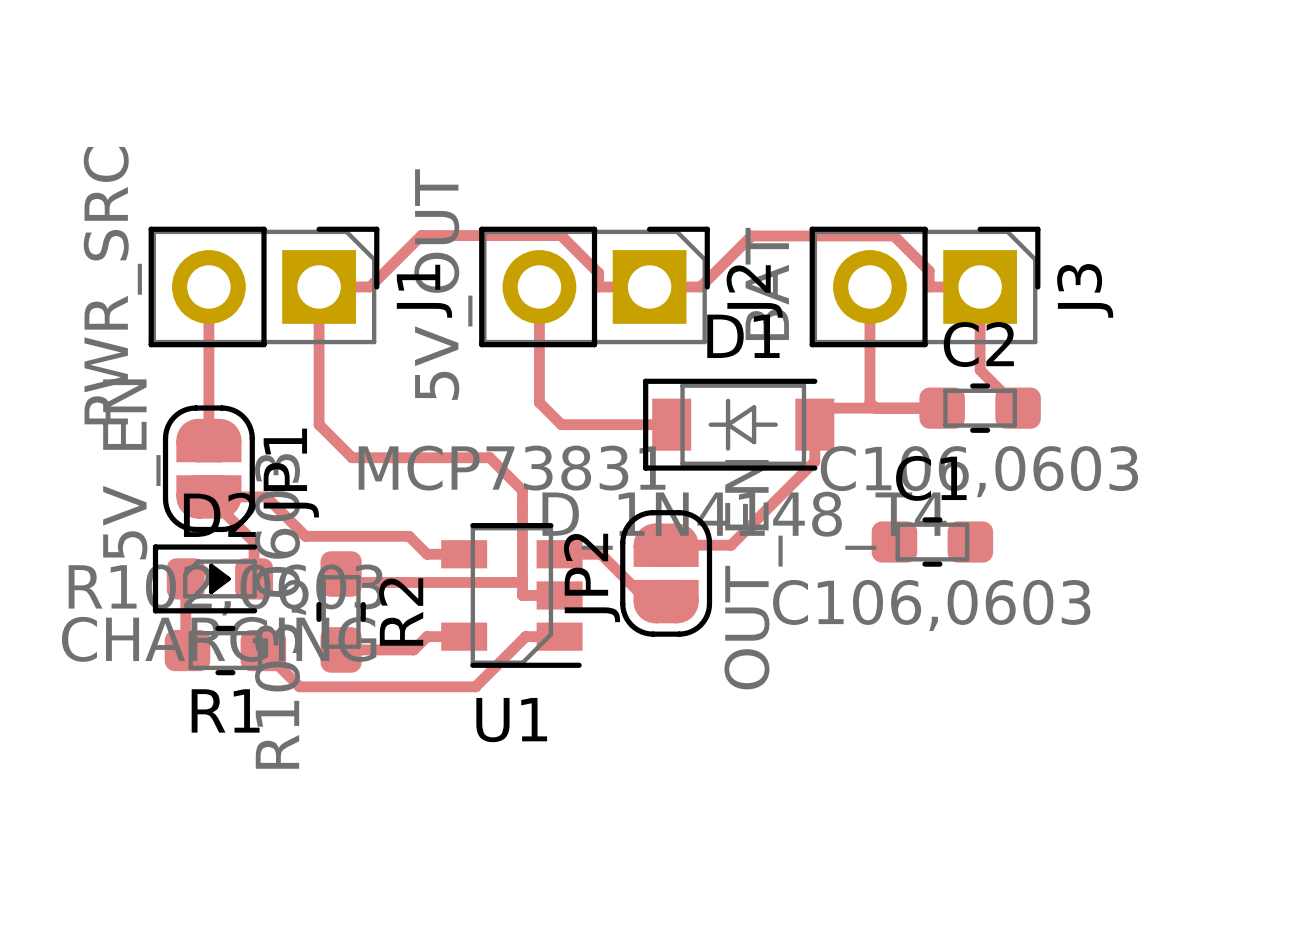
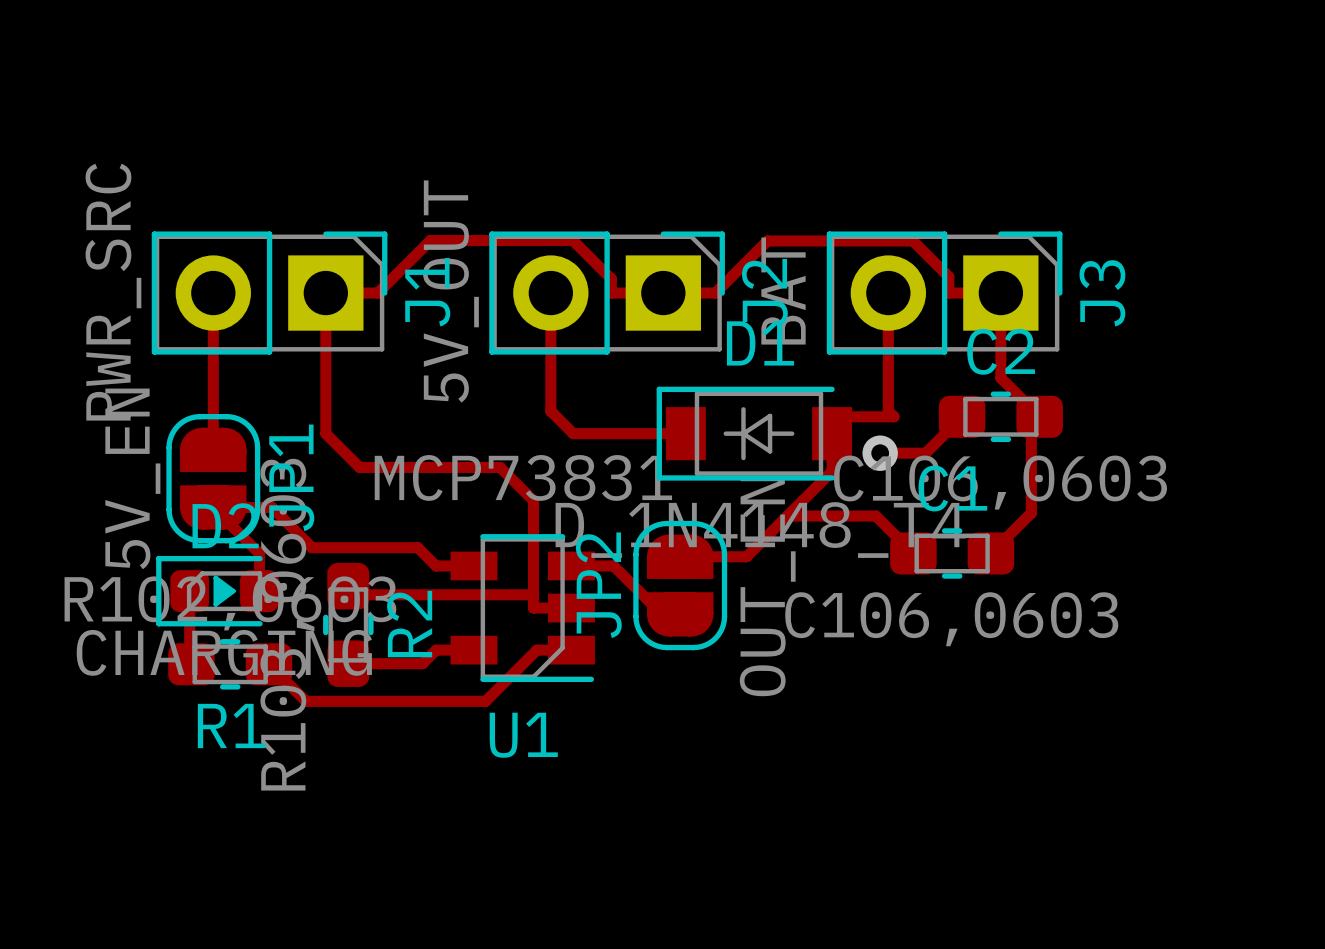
track: none -> (1031, 408) (1031, 513) (990, 553)
track: (875, 408) (942, 408) -> (880, 453) (925, 453) (962, 416)
via: none -> (880, 453)
track: none -> (787, 516) (875, 516) (913, 553)

